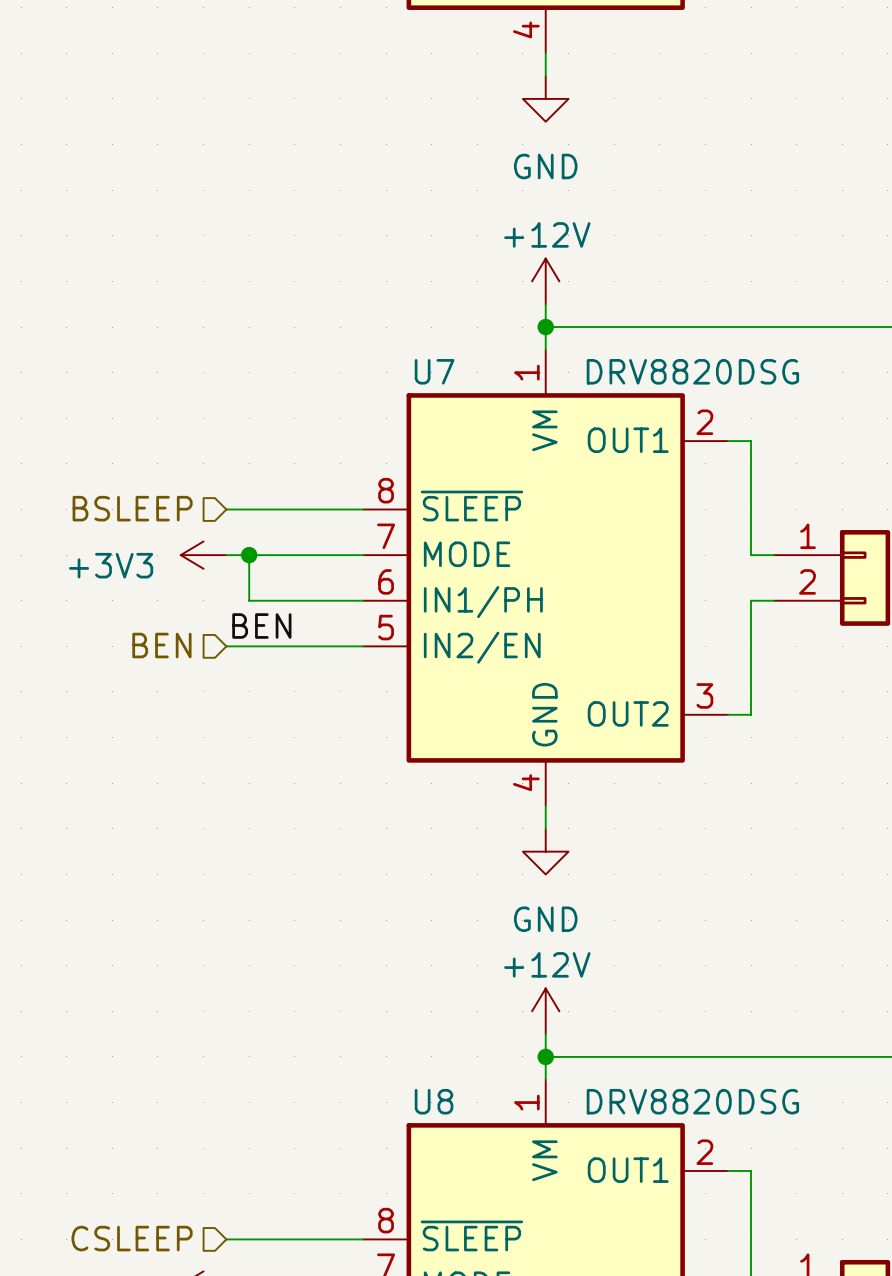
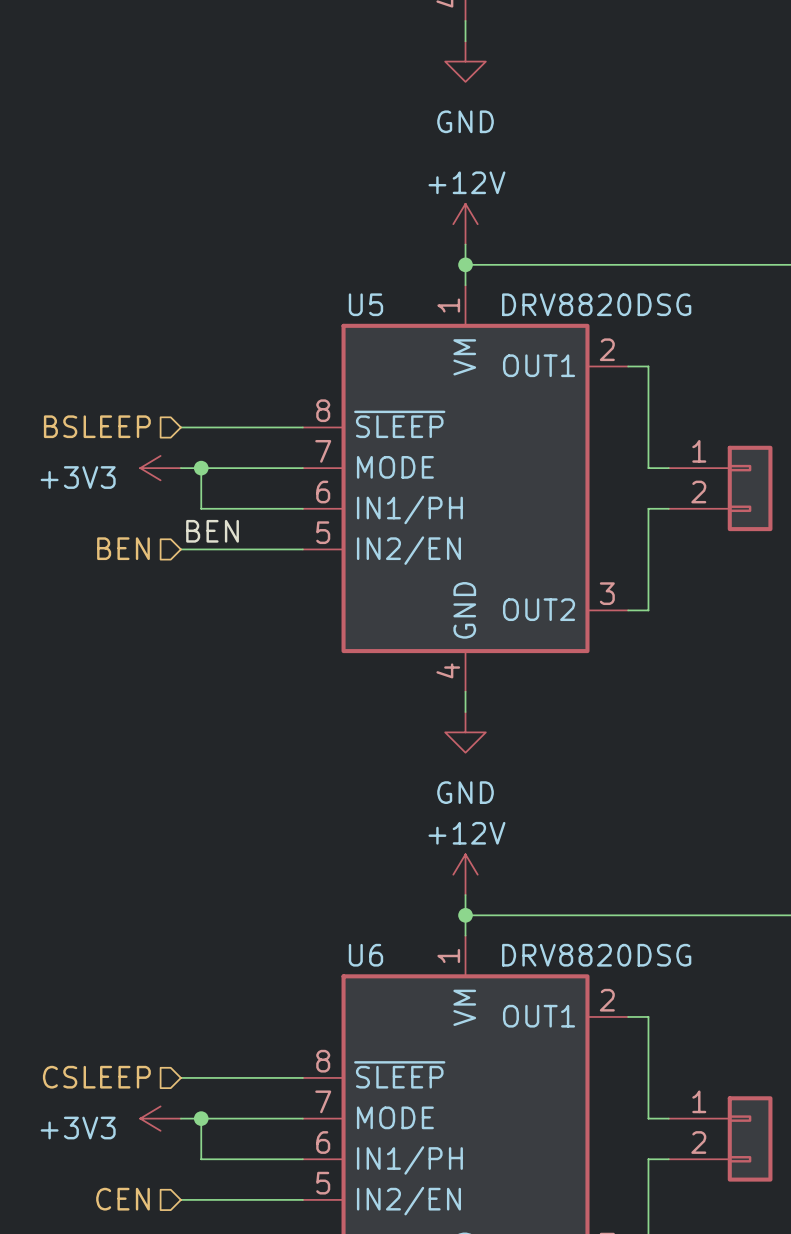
U7 name: U7 (434, 371) -> U5 (365, 304)
U8 name: U8 (434, 1101) -> U6 (365, 955)

